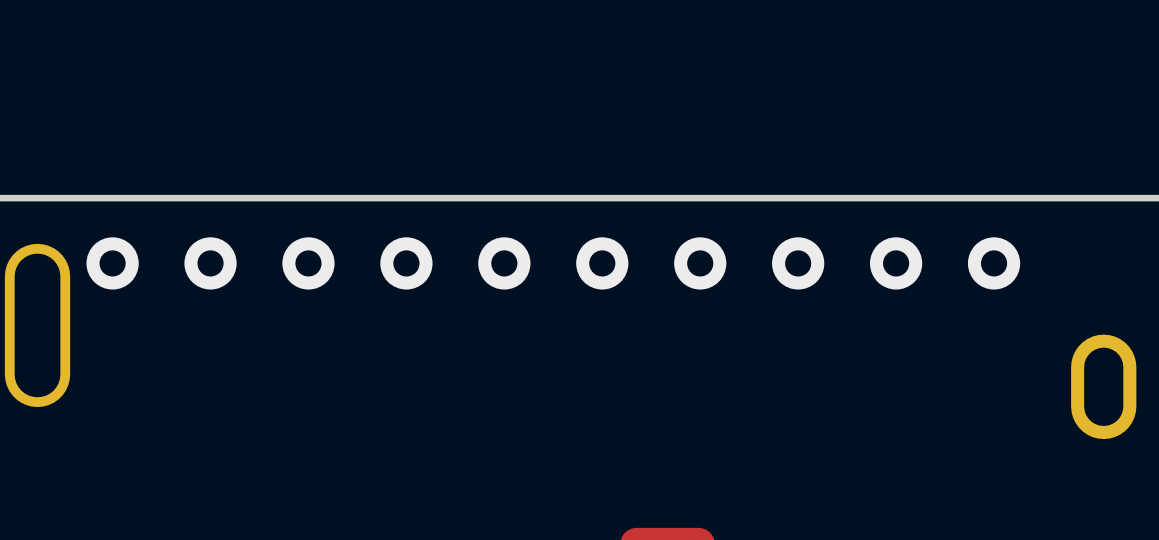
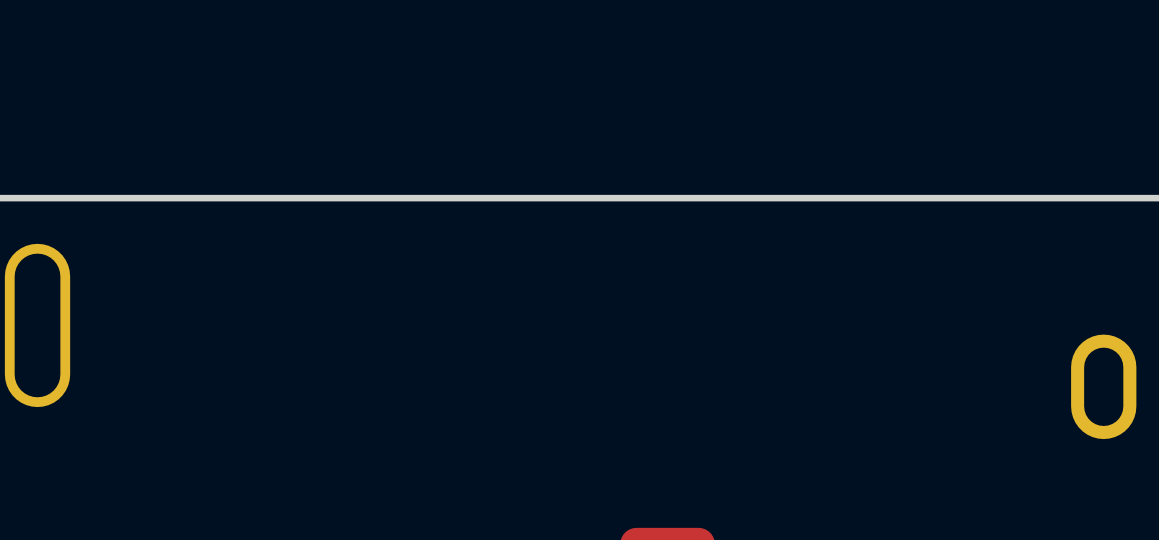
via: (112, 263) -> none
via: (210, 263) -> none
via: (308, 263) -> none
via: (406, 263) -> none
via: (504, 263) -> none
via: (602, 263) -> none
via: (700, 263) -> none
via: (798, 263) -> none
via: (896, 263) -> none
via: (994, 263) -> none

